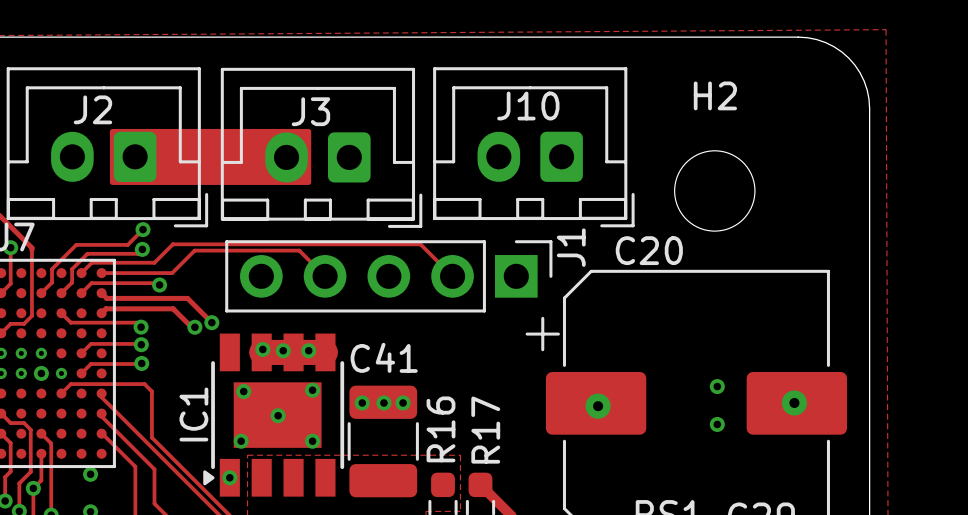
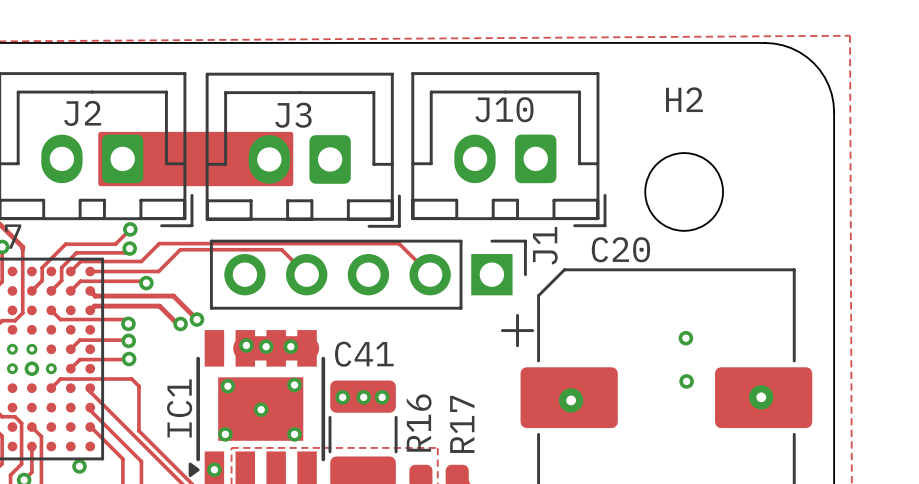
via: none -> (685, 338)
via: (717, 424) -> none

